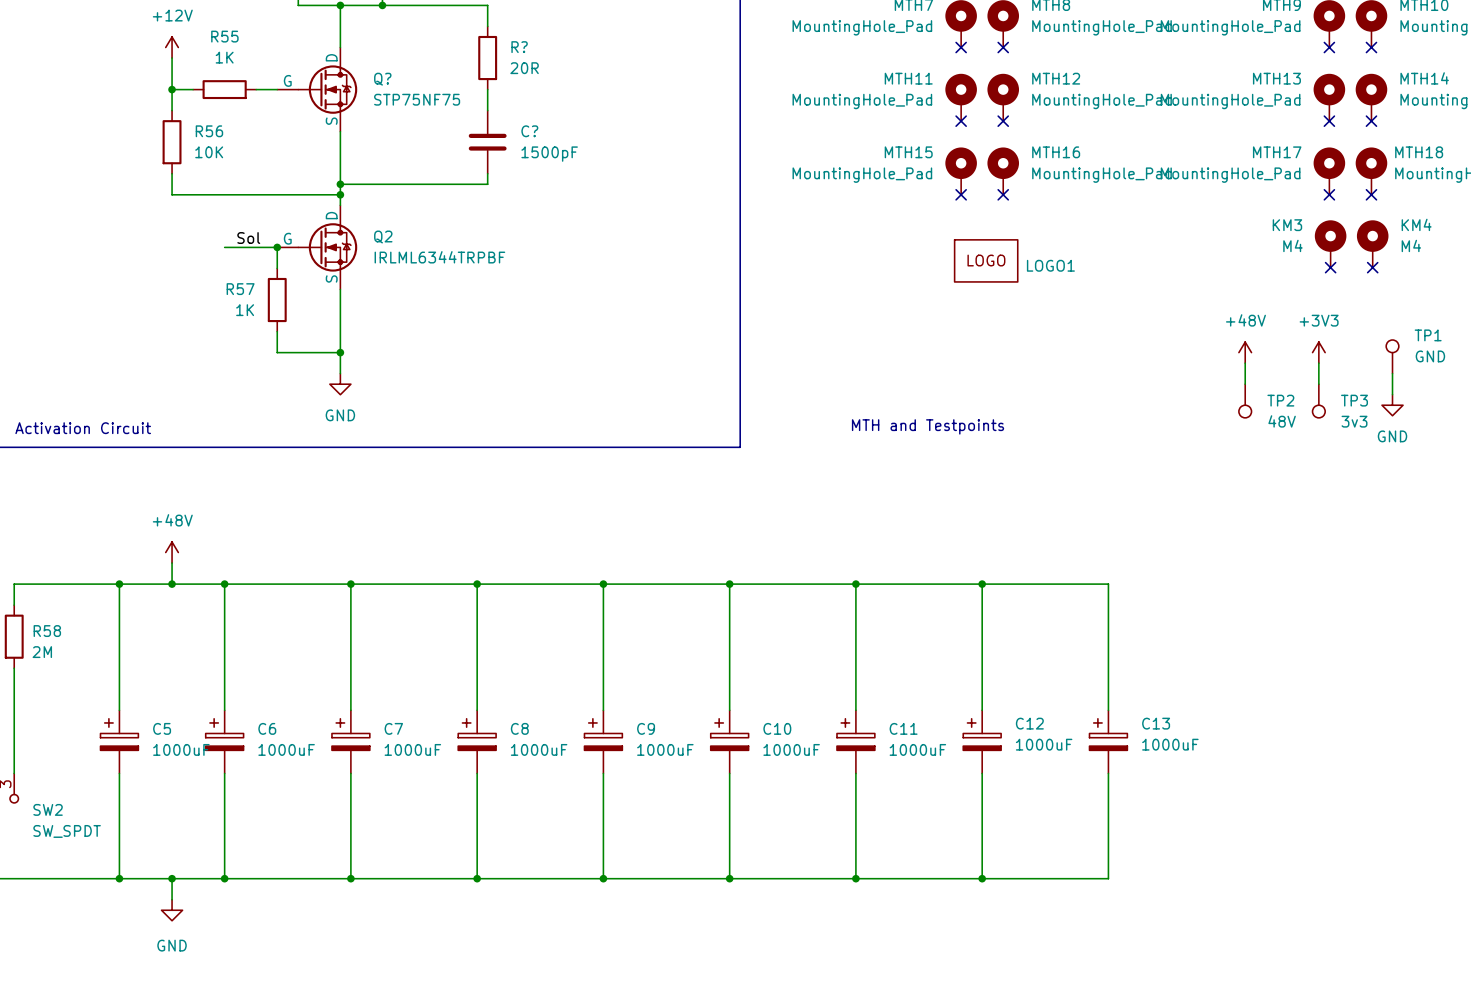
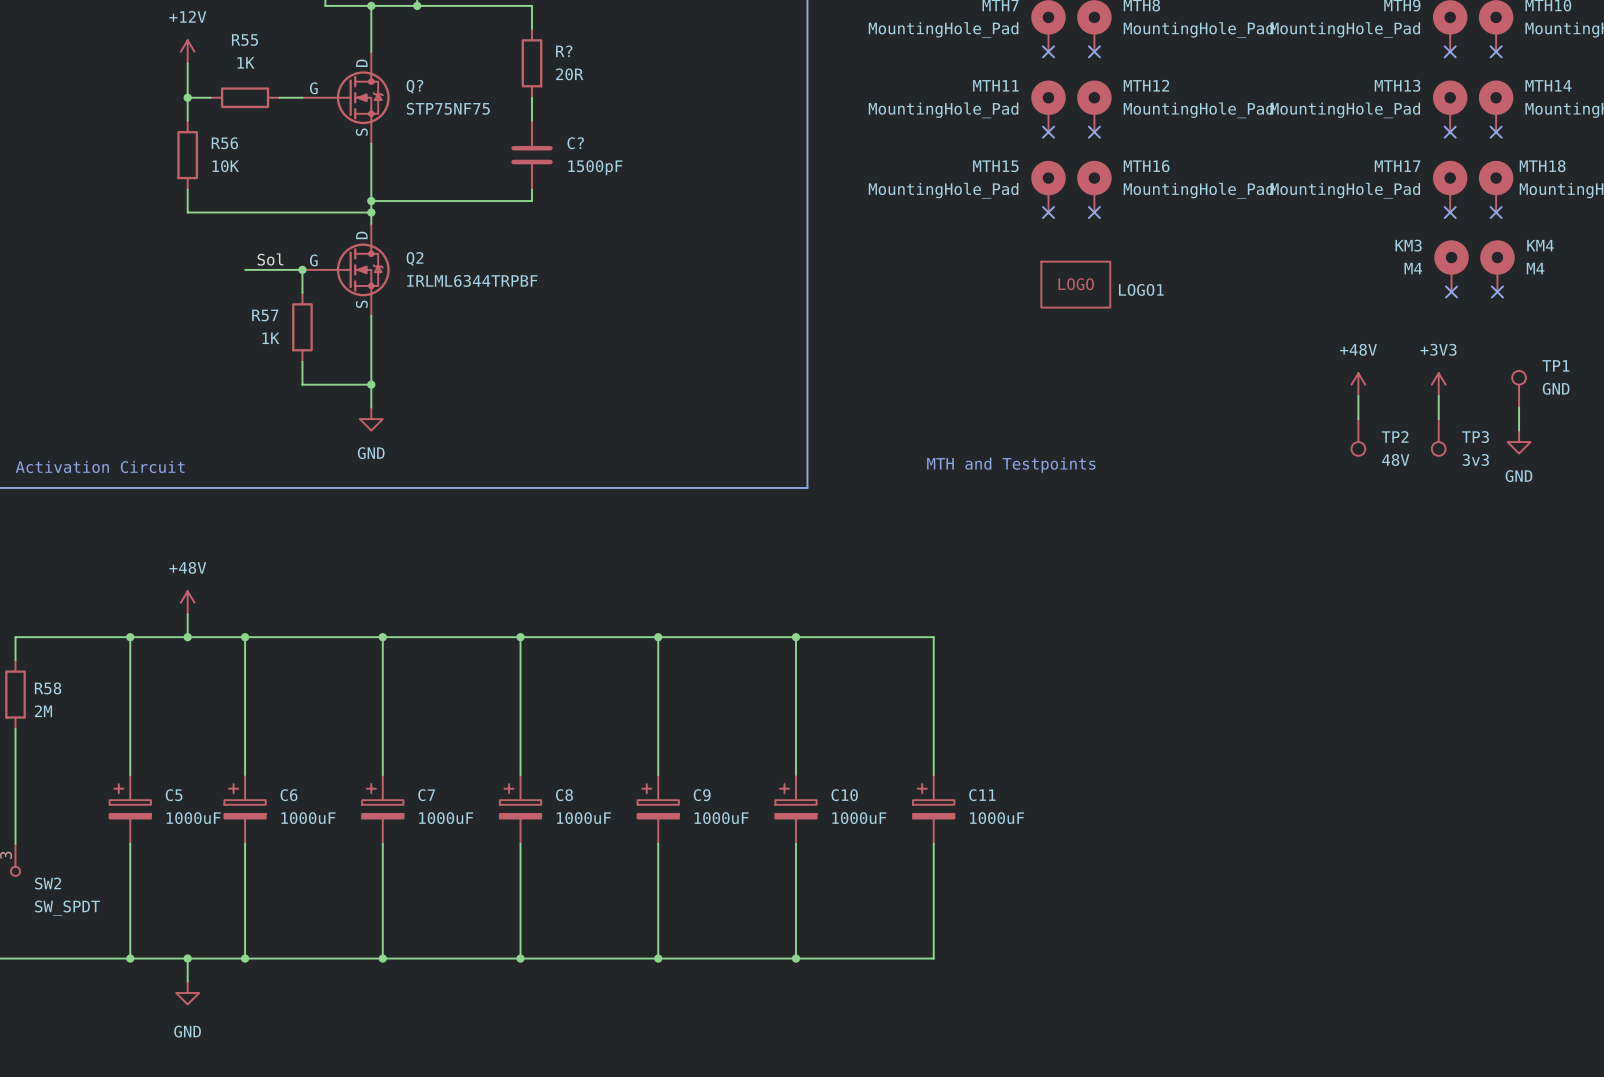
wire: (855, 584) (1108, 584) (1108, 710) -> none
junction: (855, 584) -> none
wire: (982, 584) (982, 710) -> none
junction: (982, 584) -> none
C12: 1000uF (982, 741) -> none
C13: 1000uF (1108, 741) -> none
wire: (982, 773) (982, 878) -> none
wire: (1108, 773) (1108, 878) (855, 878) -> none
junction: (855, 878) -> none
junction: (982, 878) -> none

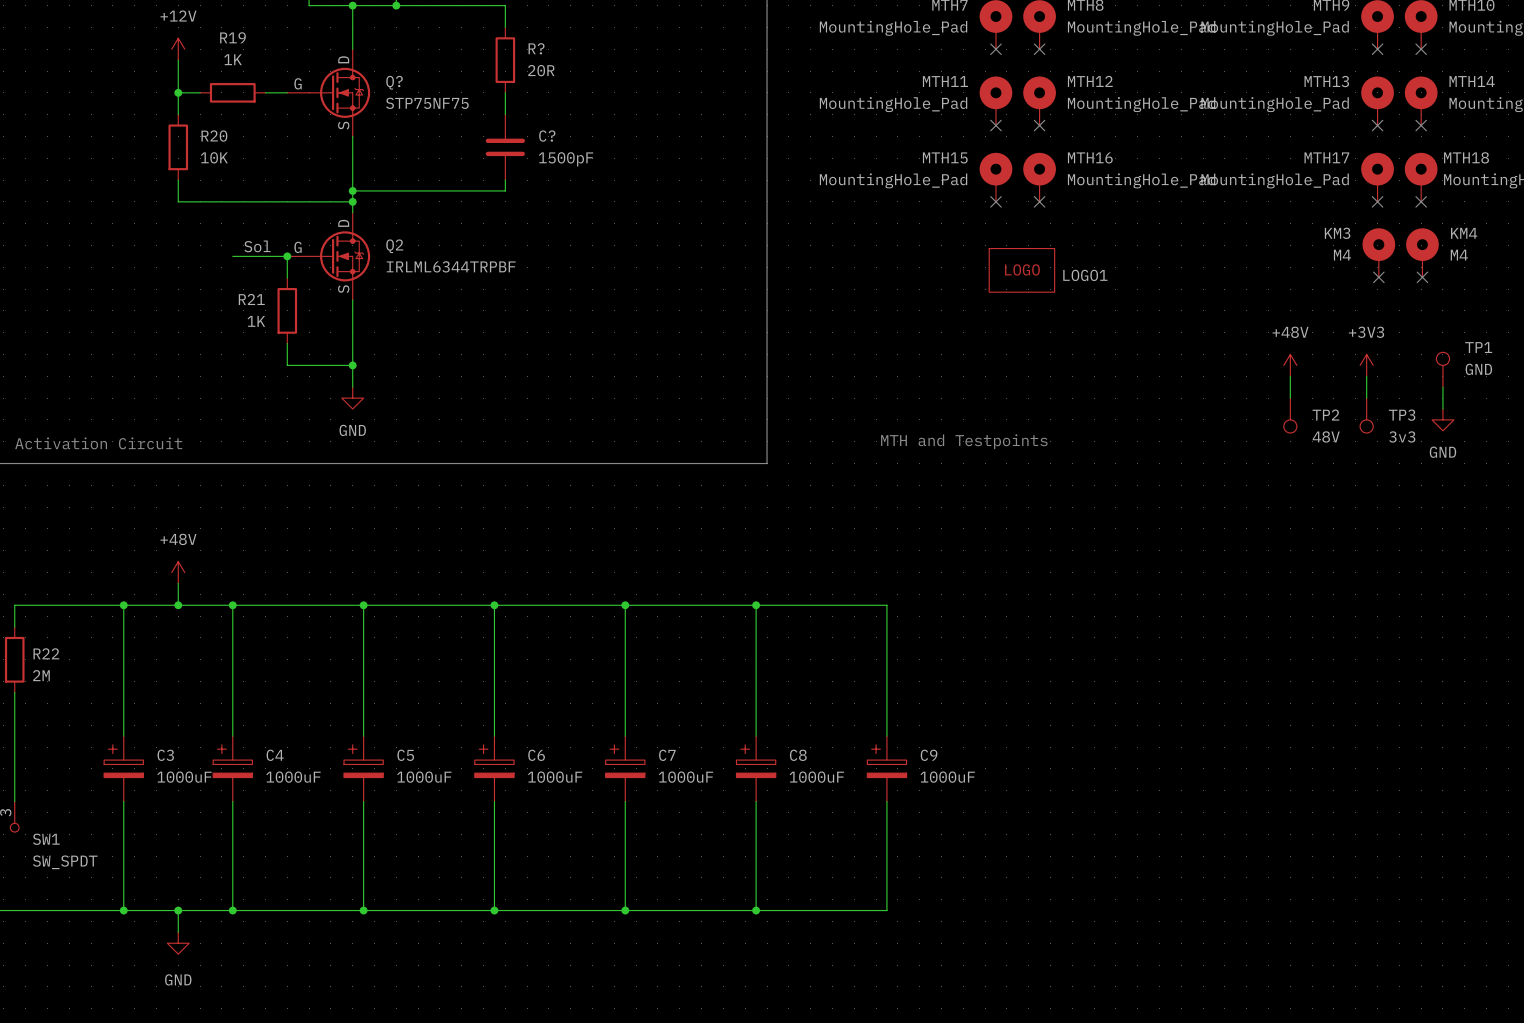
R55 name: R55 (244, 40) -> R19 (232, 37)
R56 name: R56 (224, 143) -> R20 (214, 136)
R57 name: R57 (265, 315) -> R21 (251, 299)
R58 name: R58 (48, 688) -> R22 (46, 653)
C5 name: C5 (174, 795) -> C3 (165, 755)
C6 name: C6 (288, 795) -> C4 (275, 755)
C7 name: C7 (426, 795) -> C5 (405, 755)
C8 name: C8 (564, 795) -> C6 (536, 755)
C9 name: C9 (702, 795) -> C7 (667, 755)
C10 name: C10 (844, 795) -> C8 (798, 755)
C11 name: C11 (982, 795) -> C9 (929, 755)
SW2 name: SW2 (48, 883) -> SW1 (46, 839)

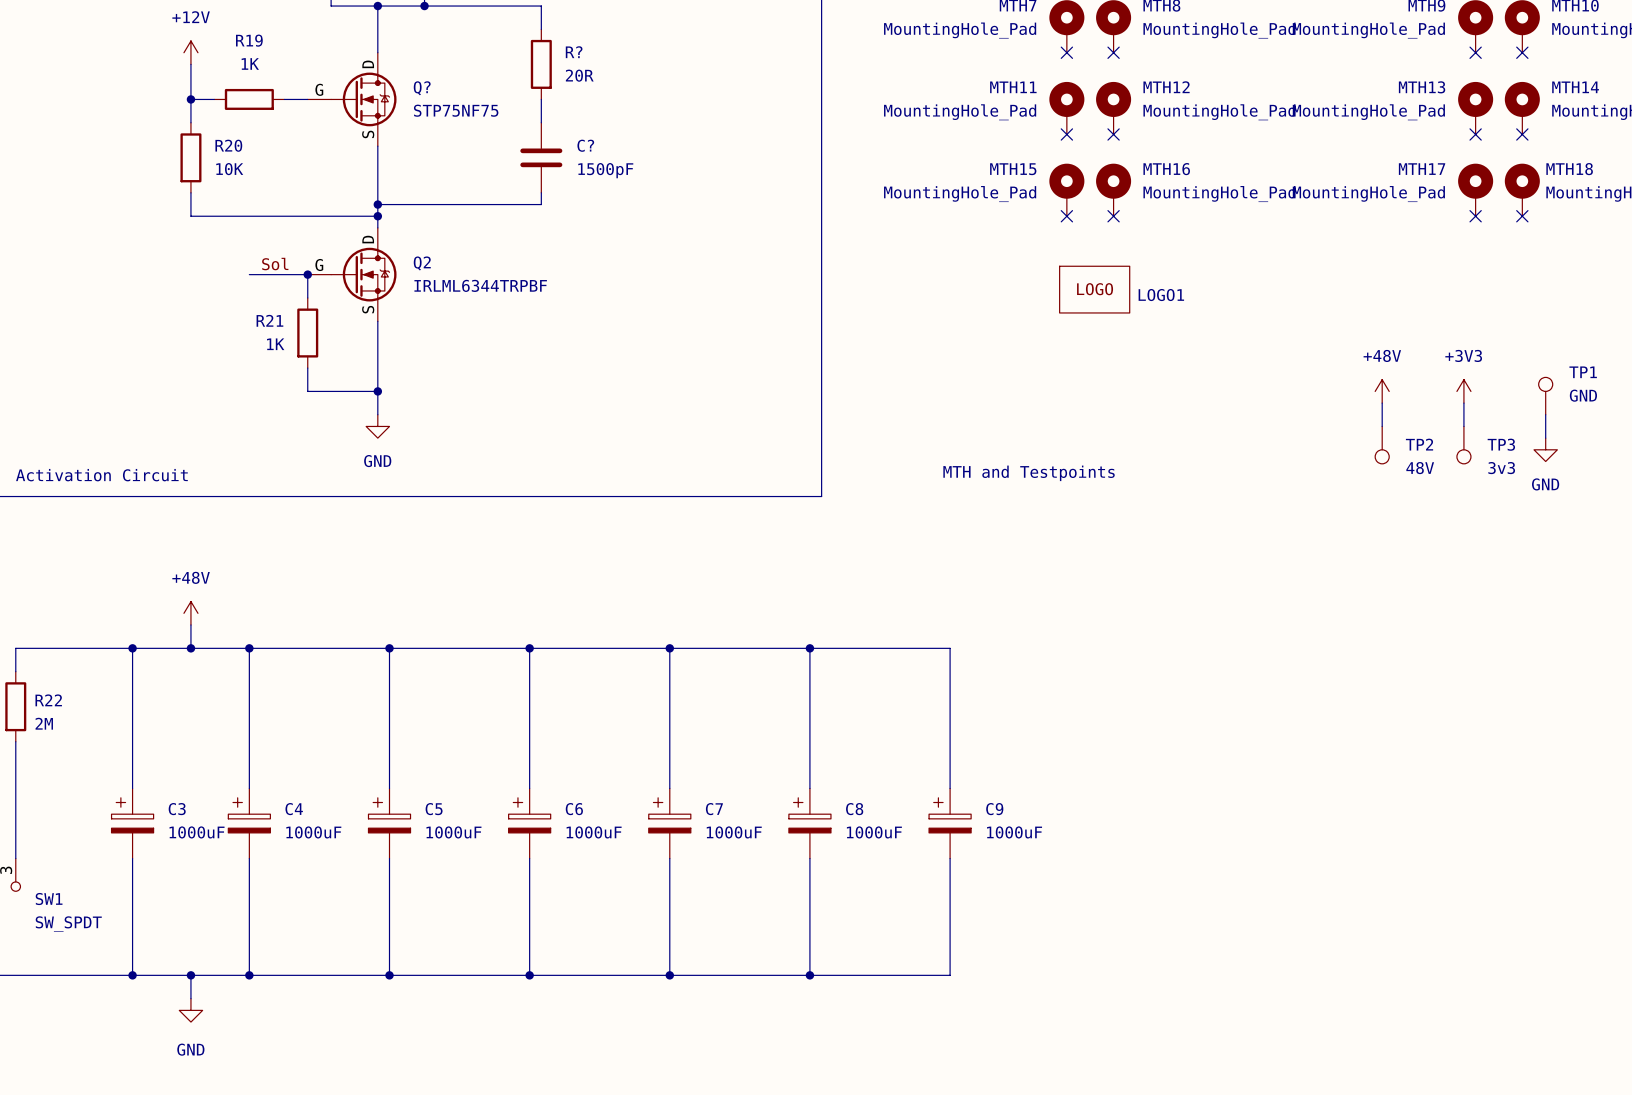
KM3: M4 (1378, 252) -> none
KM4: M4 (1422, 252) -> none
no-connect mark: (1378, 277) -> none
no-connect mark: (1422, 277) -> none

